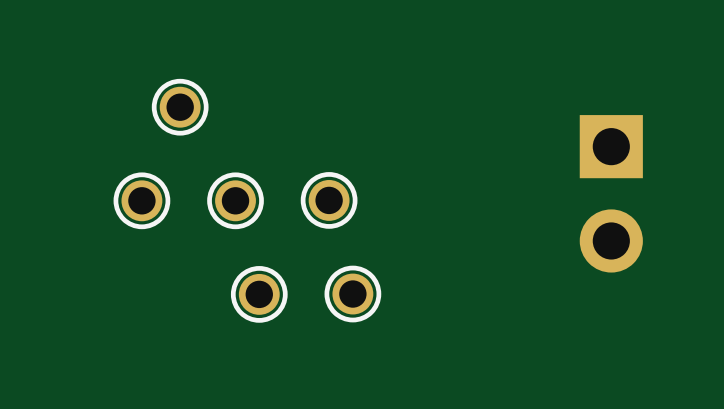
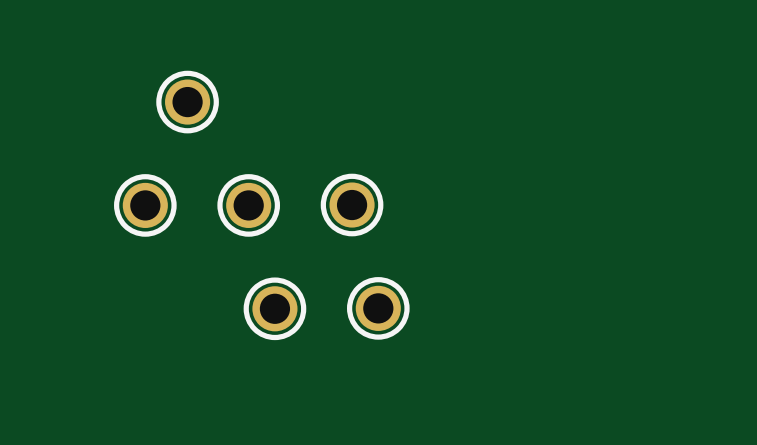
part: (611, 193) -> none

